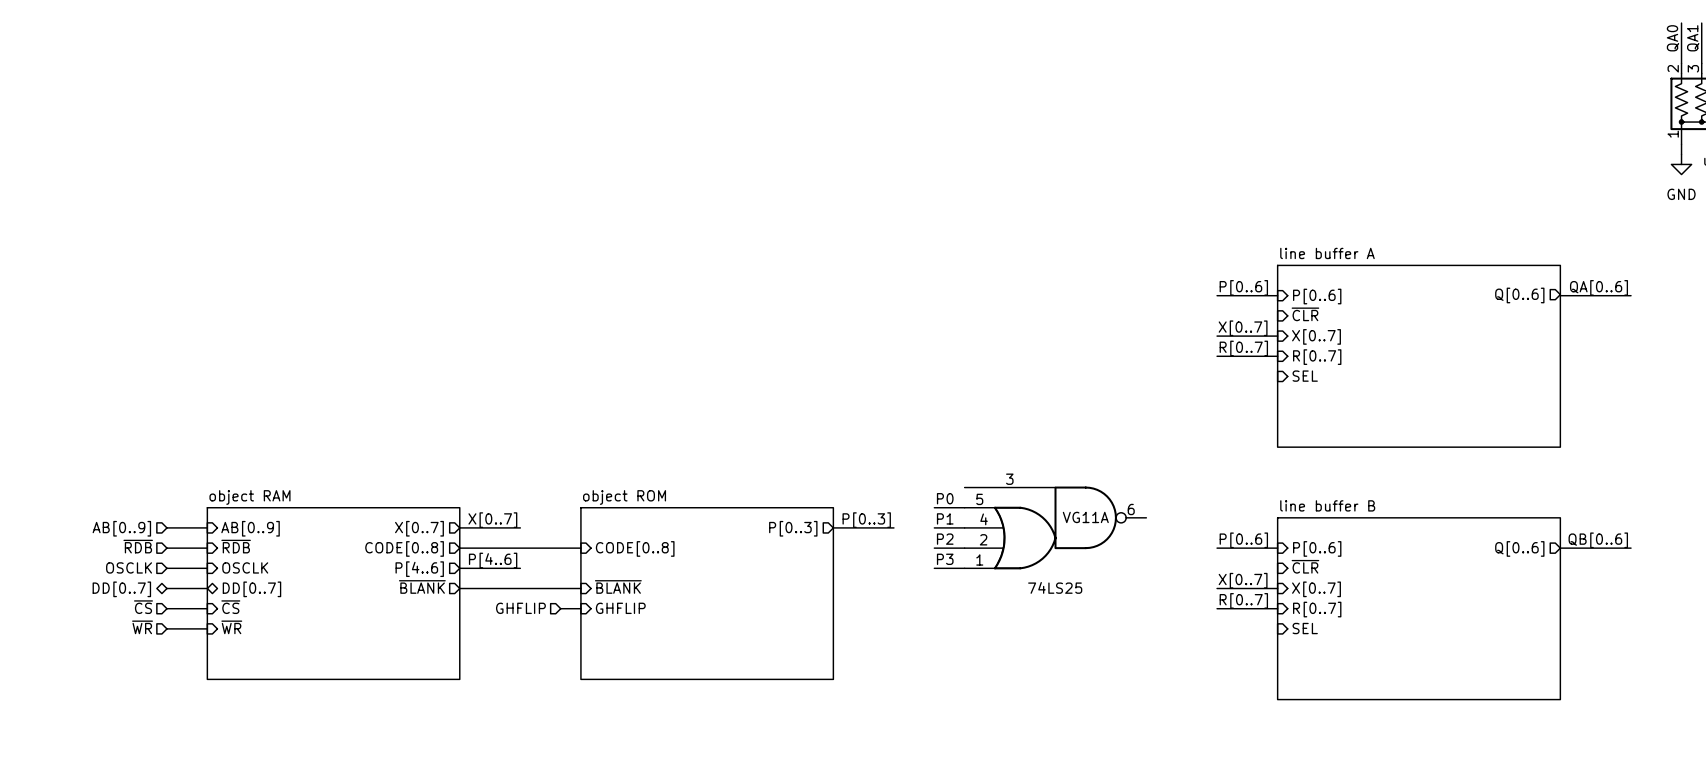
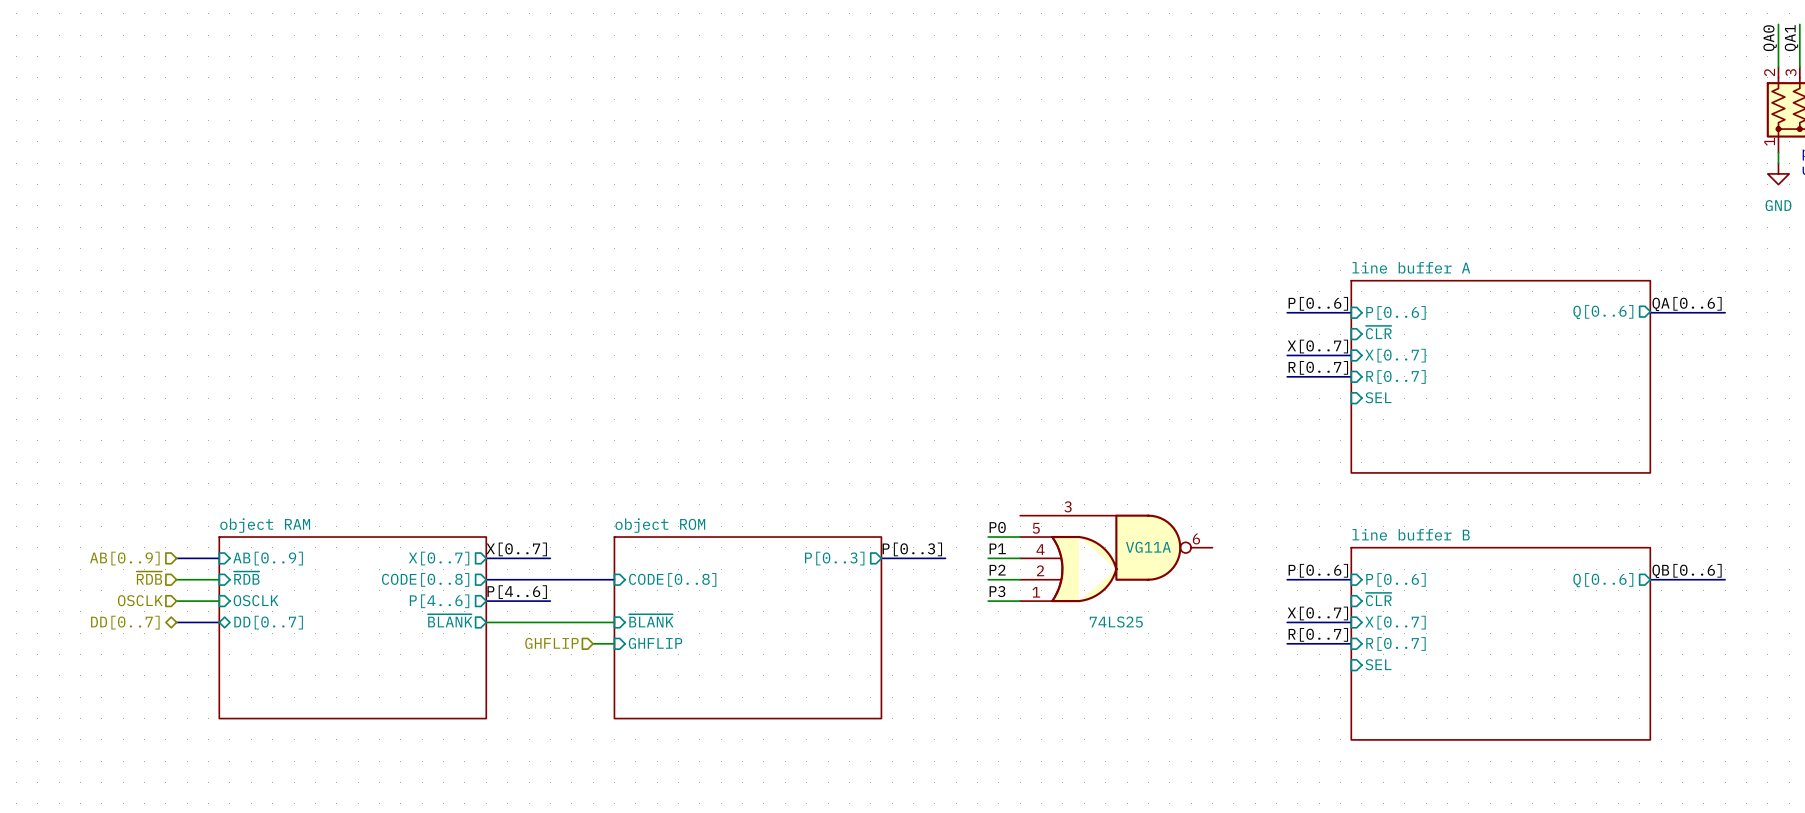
hierarchical label: ~{CS} (143, 607) -> none
sheet pin: ~{CS} (230, 607) -> none
wire: (166, 608) (207, 608) -> none
hierarchical label: ~{WR} (142, 627) -> none
sheet pin: ~{WR} (231, 627) -> none
wire: (166, 628) (207, 628) -> none

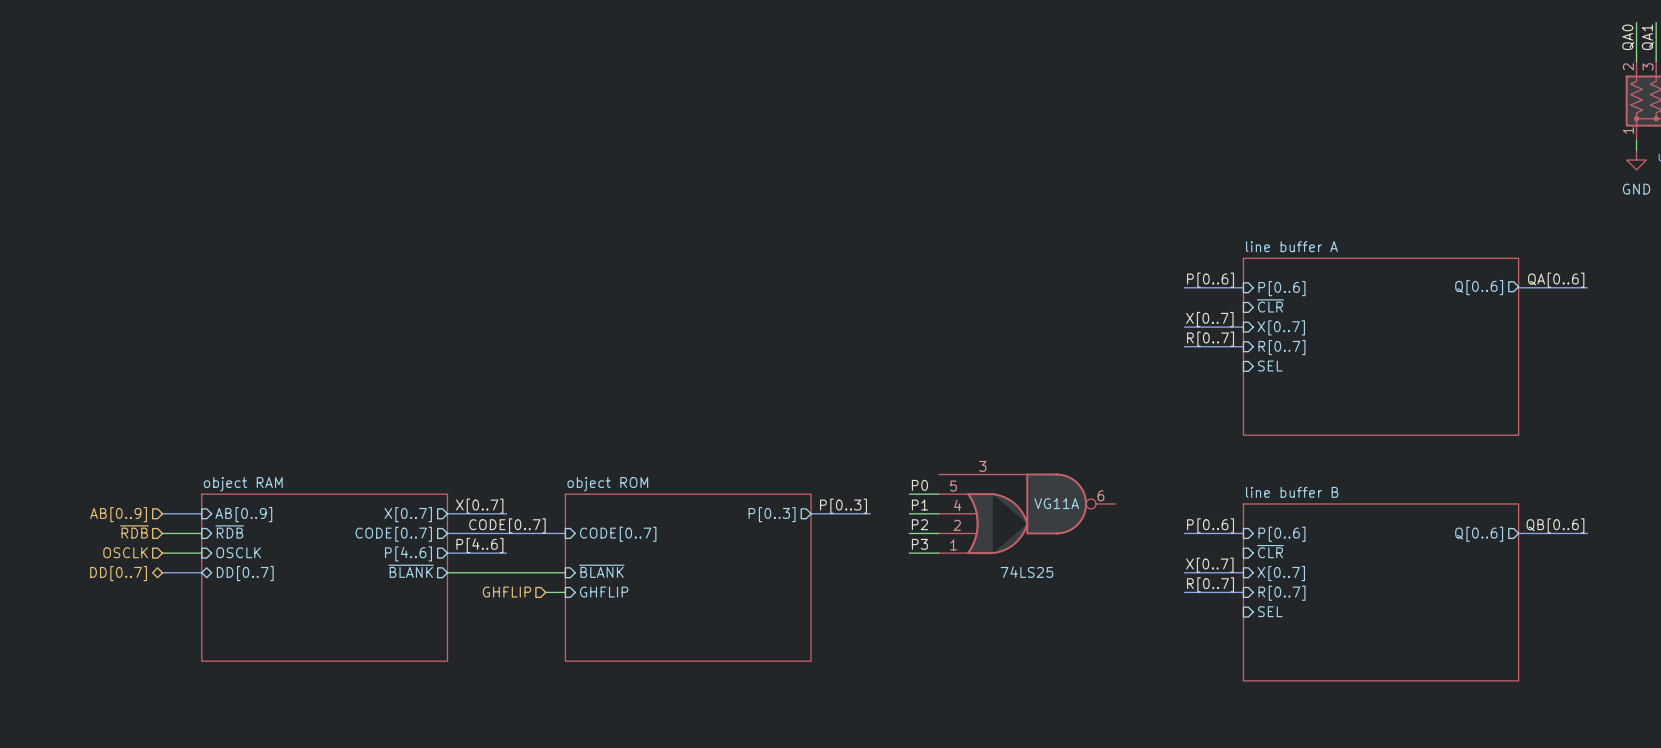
label: none -> CODE[0..7] (507, 525)
sheet pin: CODE[0..8] (425, 579) -> CODE[0..7] (393, 534)
sheet pin: CODE[0..8] (672, 579) -> CODE[0..7] (618, 534)

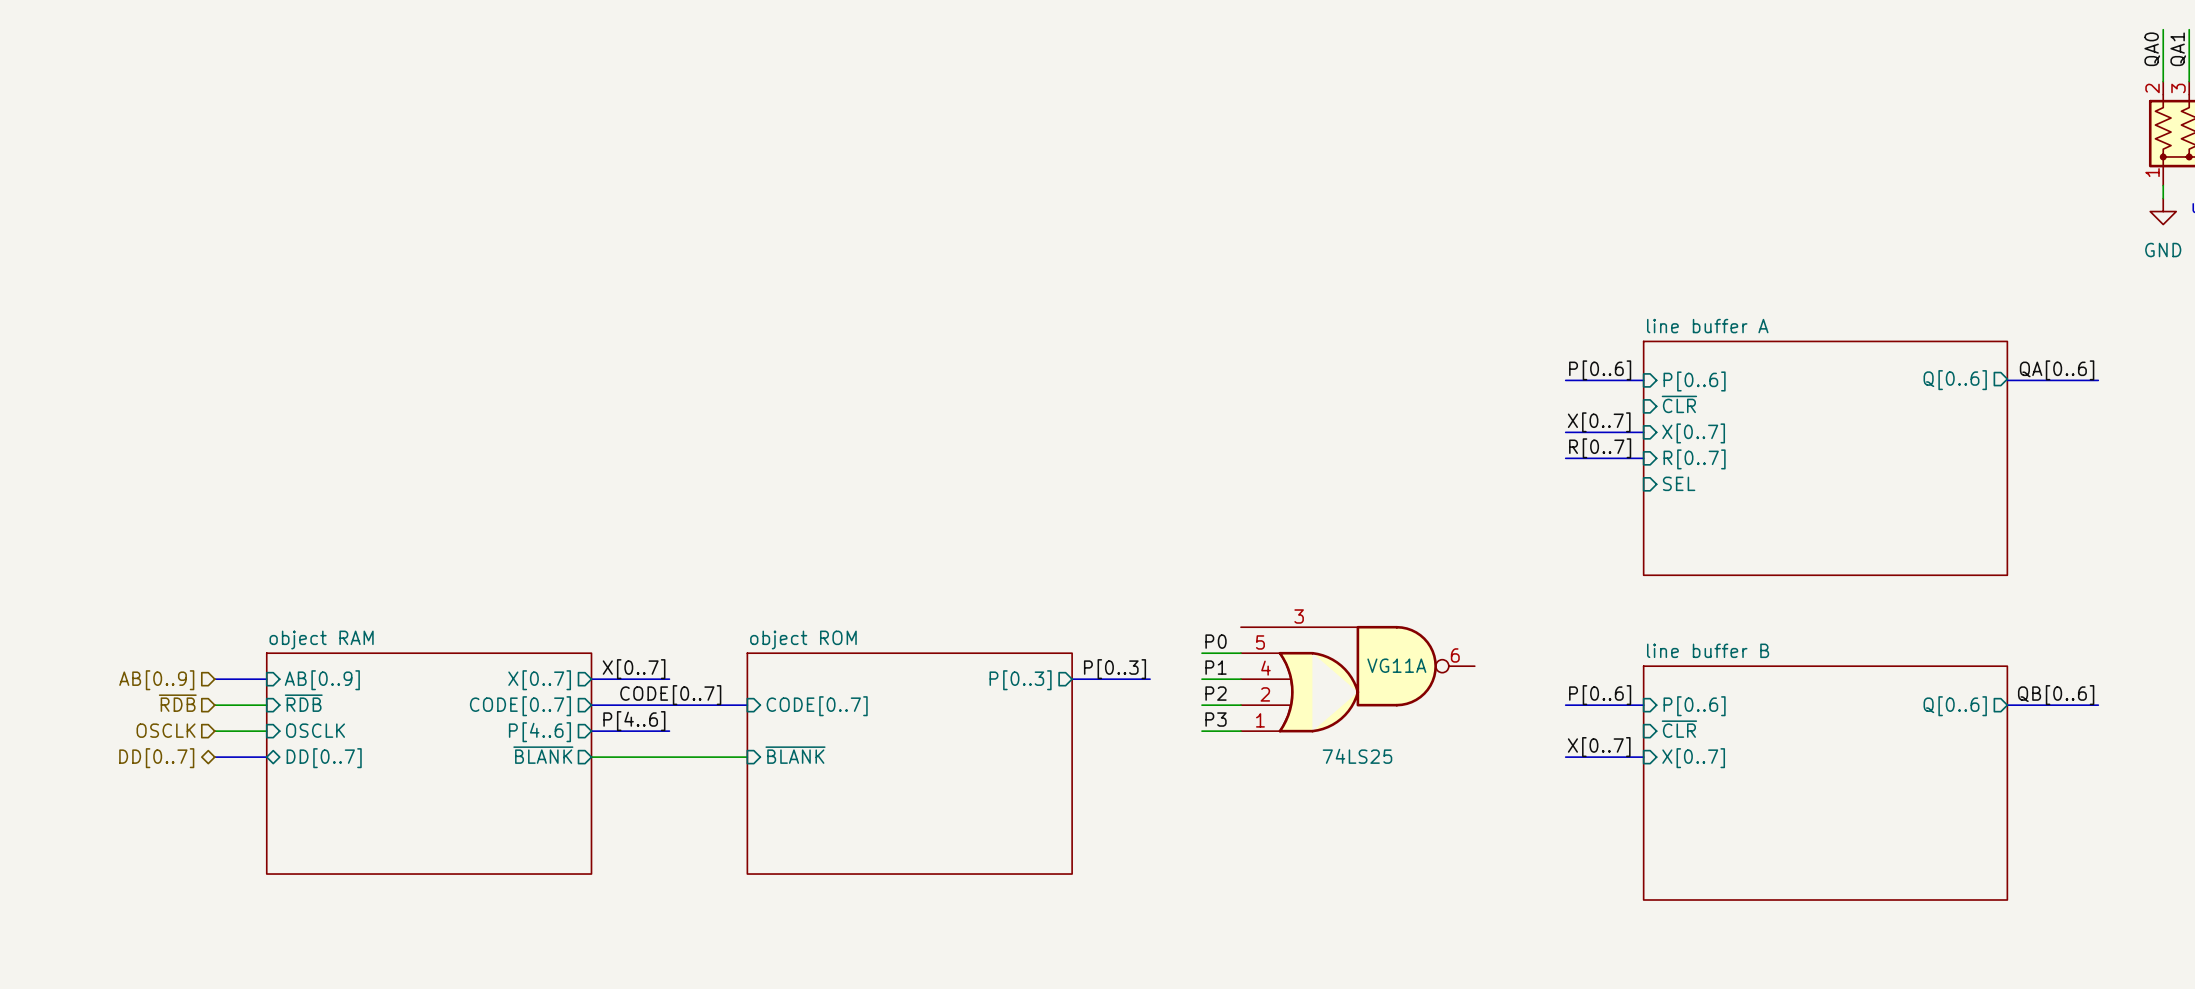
label: R[0..7] (1210, 584) -> none
hierarchical label: GHFLIP (506, 592) -> none
wire: (545, 592) (565, 592) -> none
sheet pin: GHFLIP (604, 592) -> none
bus: (1184, 592) (1243, 592) -> none
sheet pin: R[0..7] (1281, 593) -> none
sheet pin: SEL (1270, 611) -> none

